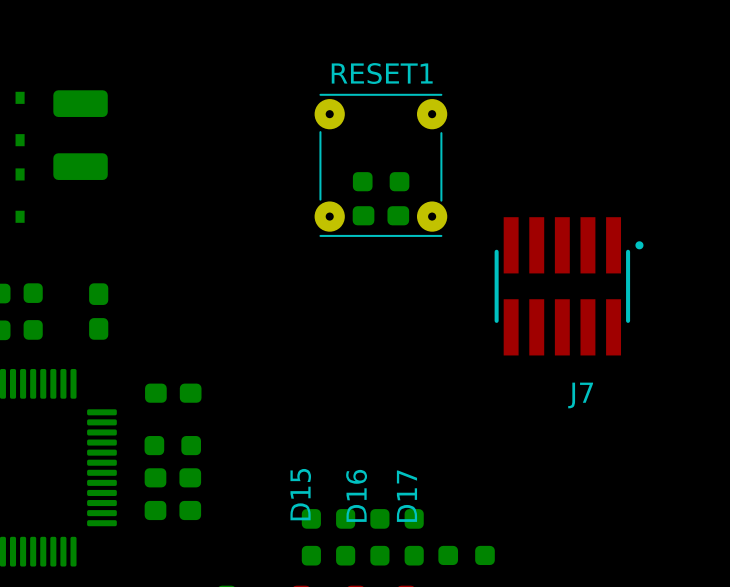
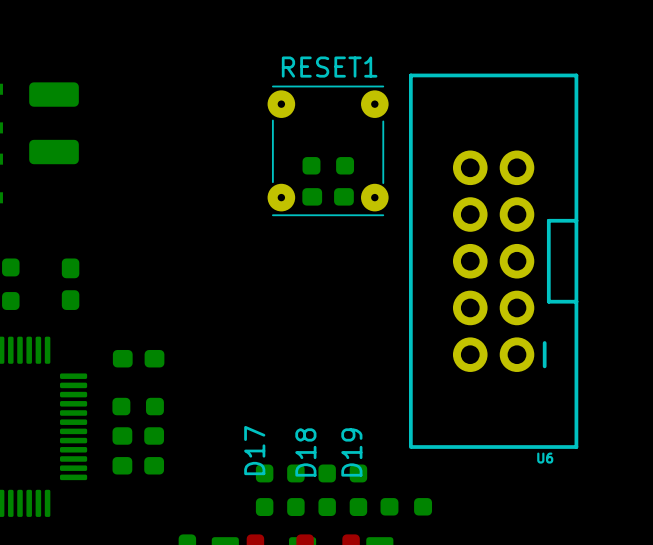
U6: none -> (493, 261)
J7: (569, 286) -> none
D15 name: D15 (300, 494) -> D17 (254, 450)
D16 name: D16 (356, 495) -> D18 (305, 452)
D17 name: D17 (406, 496) -> D19 (351, 452)

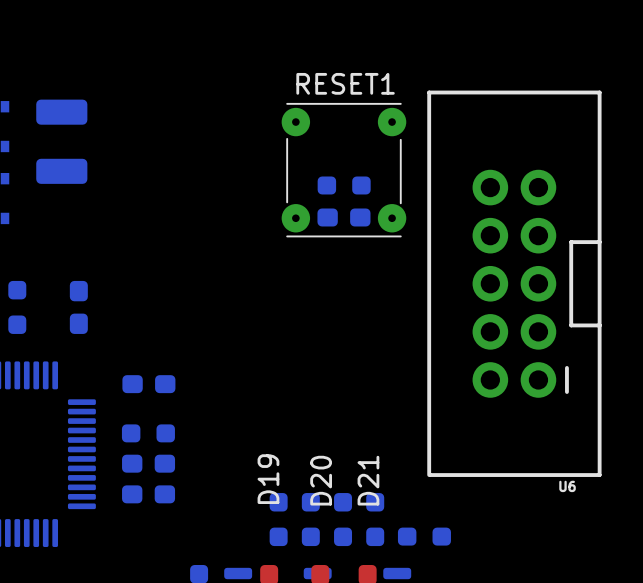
D17 name: D17 (254, 450) -> D19 (268, 479)
D18 name: D18 (305, 452) -> D20 (321, 480)
D19 name: D19 (351, 452) -> D21 (368, 480)

